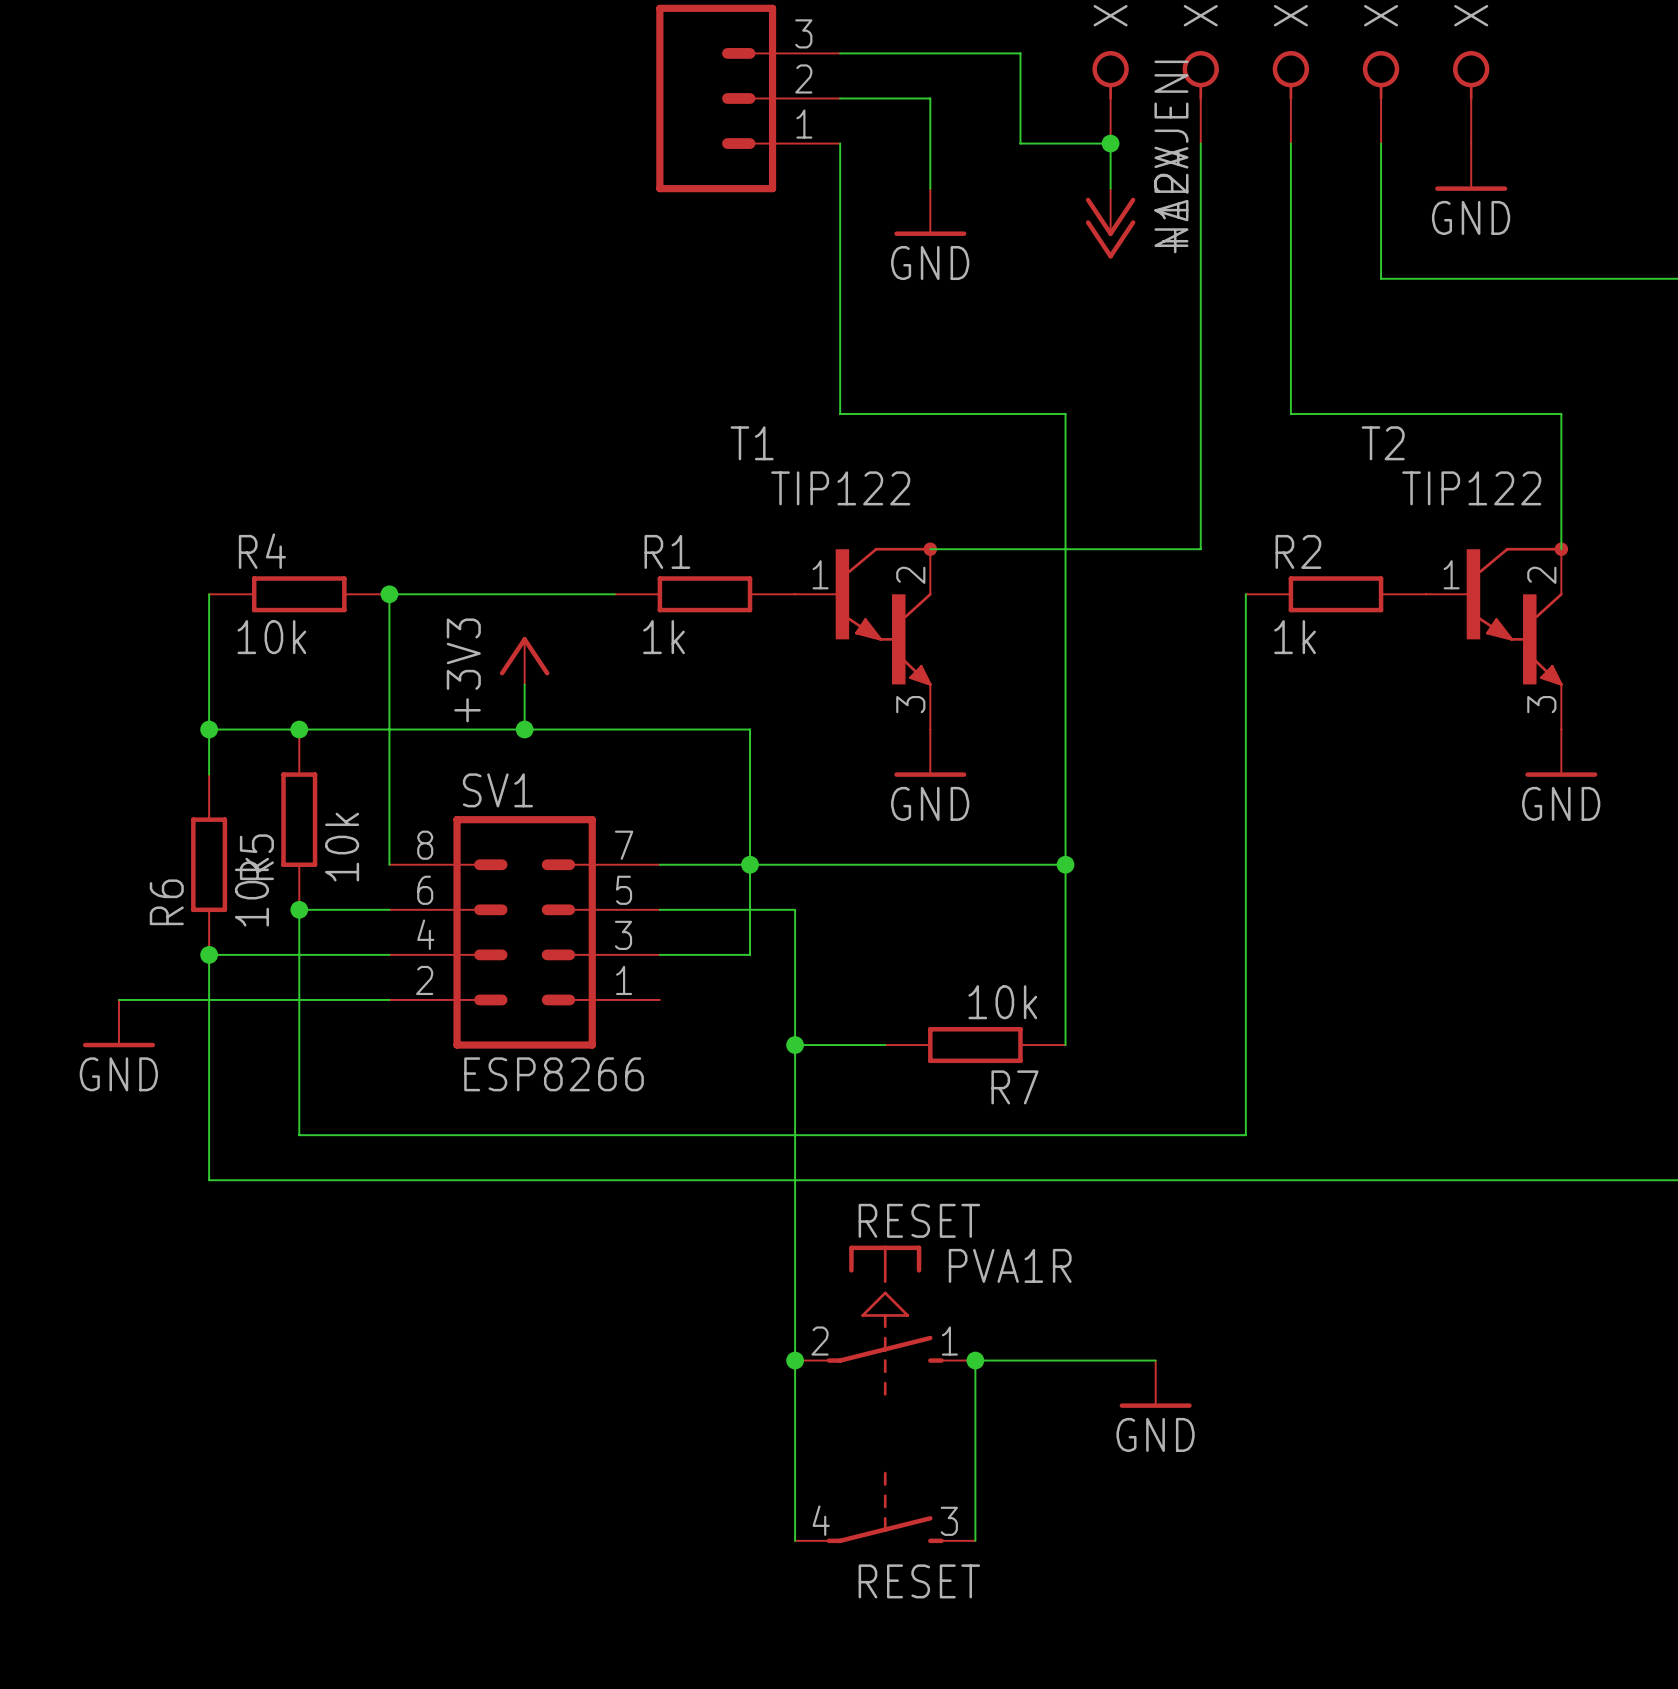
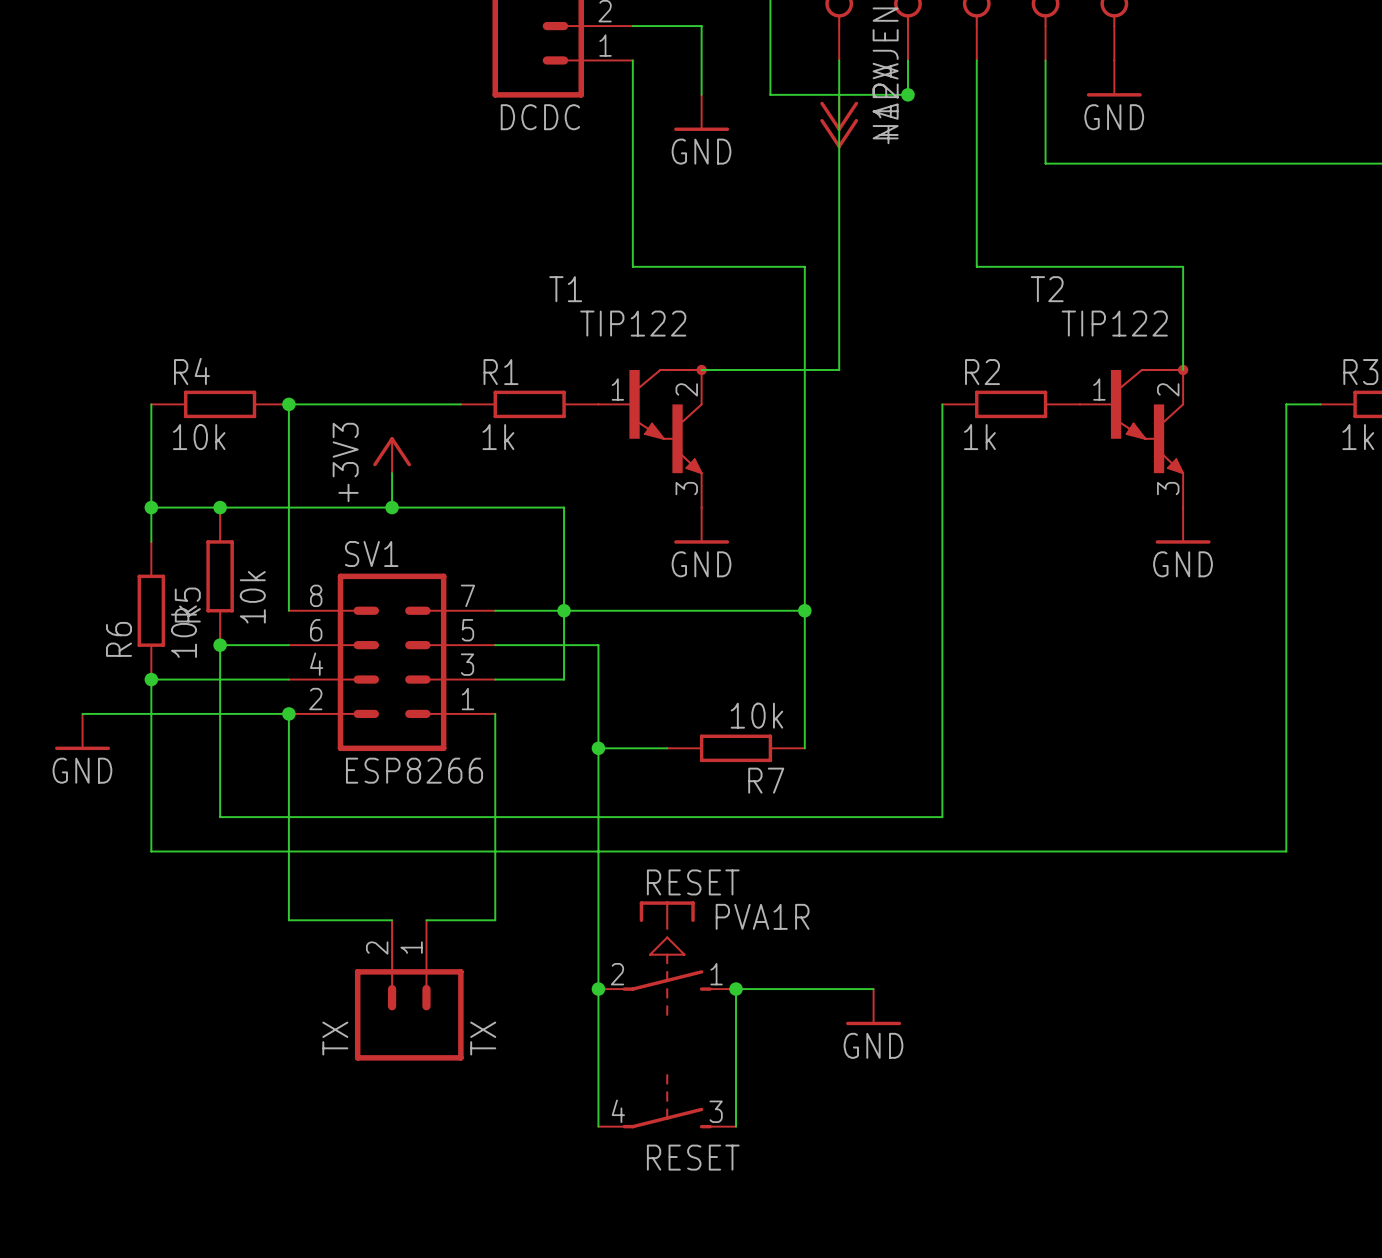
wire: (1020, 143) (1110, 143) -> (770, 60) (770, 94) (907, 94)
junction position: (1110, 143) -> (907, 94)
wire: (1200, 188) (1200, 549) (1110, 549) -> (839, 94) (839, 370)
part value: none -> DCDC (540, 117)
wire: none -> (288, 713) (288, 920) (392, 920)
junction: none -> (288, 713)
wire: none -> (495, 713) (495, 920) (426, 920)
TX: none -> TX (409, 990)

